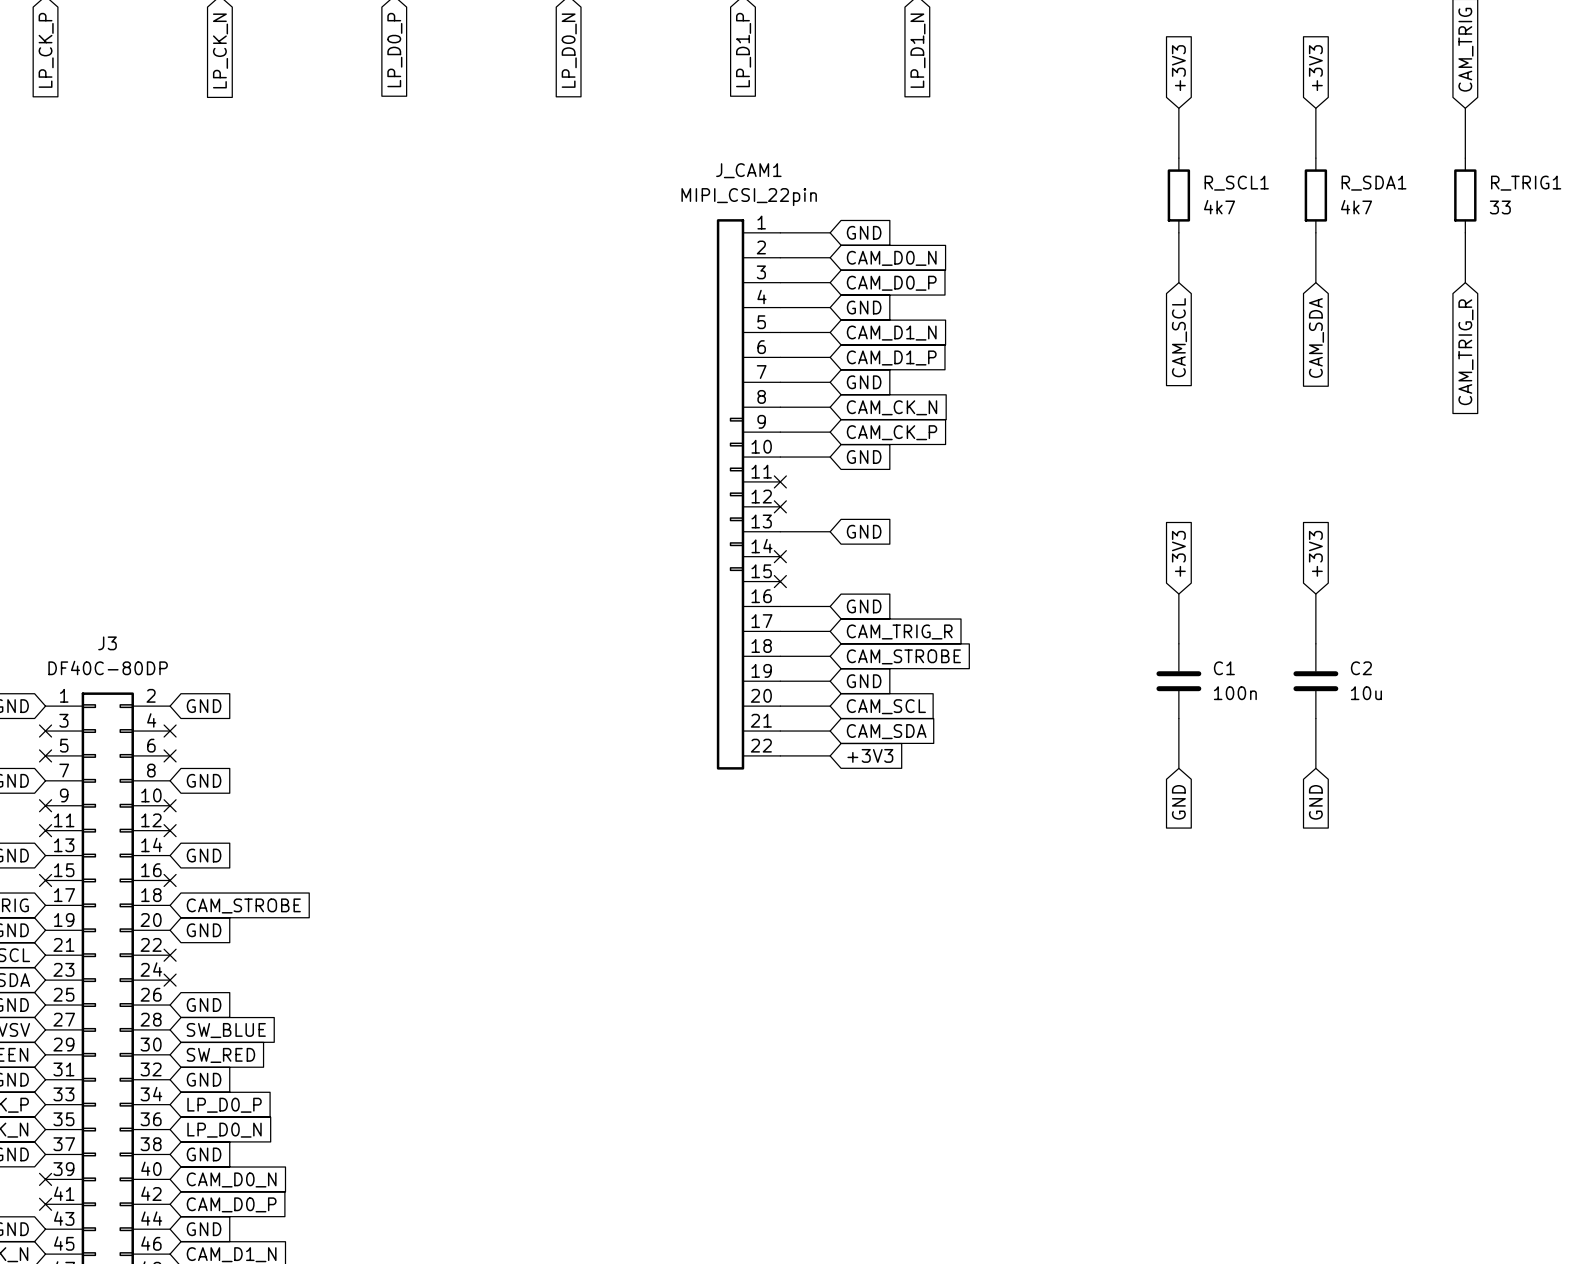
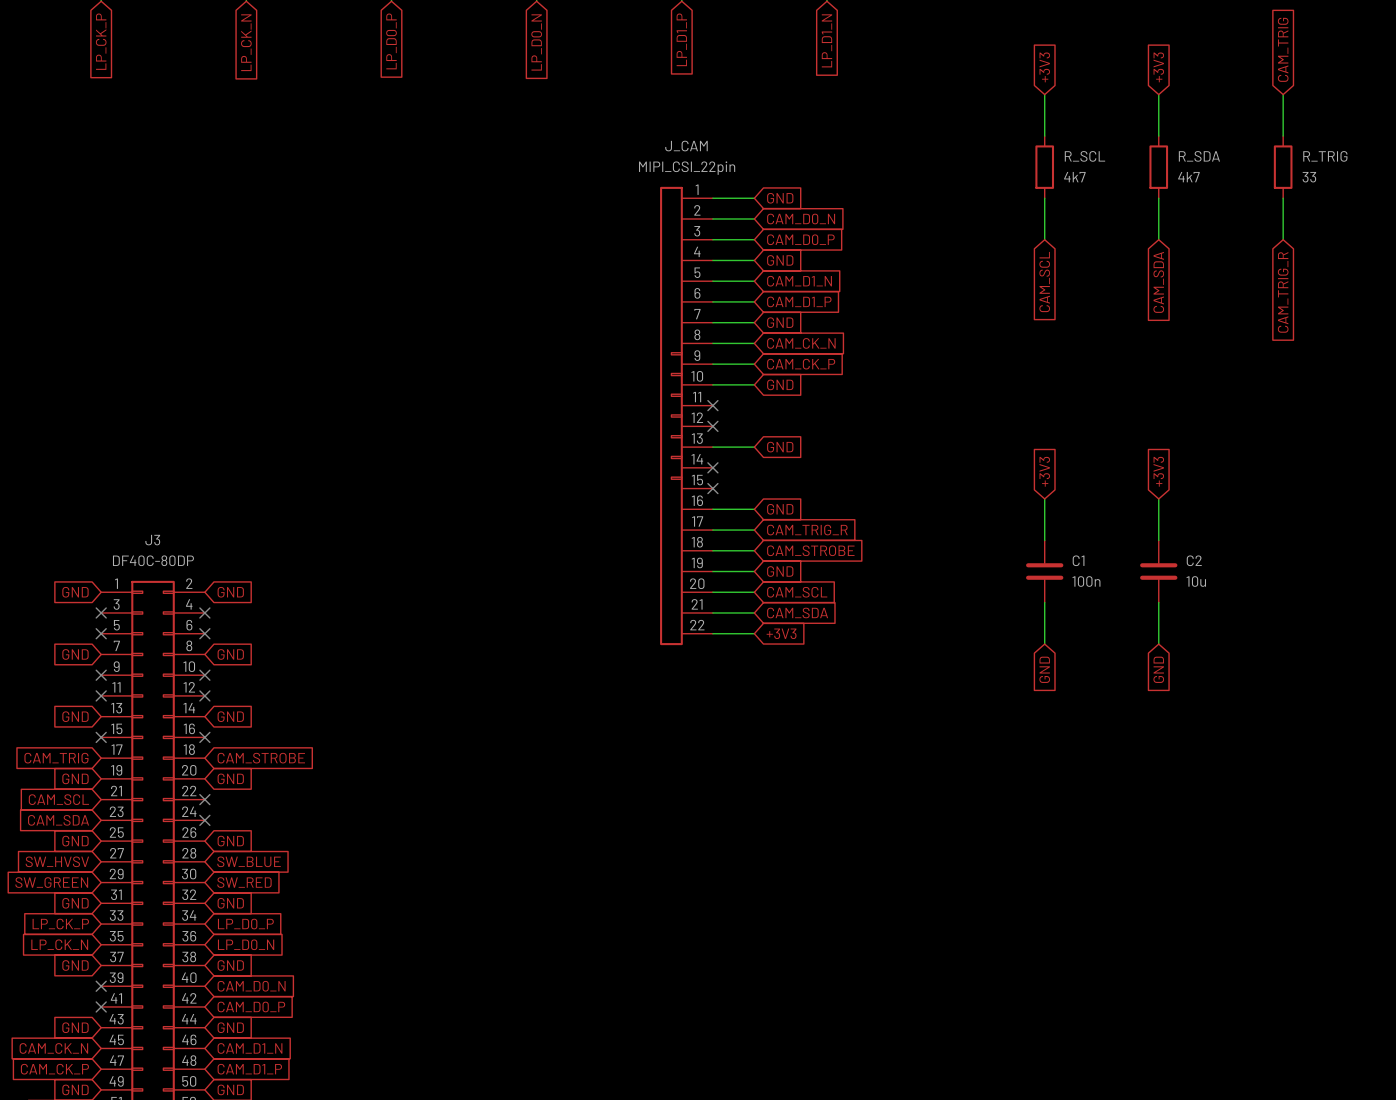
J_CAM1 name: J_CAM1 (748, 170) -> J_CAM (686, 146)
R_SCL1 name: R_SCL1 (1236, 183) -> R_SCL (1084, 156)
R_SDA1 name: R_SDA1 (1374, 183) -> R_SDA (1199, 156)
R_TRIG1 name: R_TRIG1 (1526, 183) -> R_TRIG (1325, 156)

